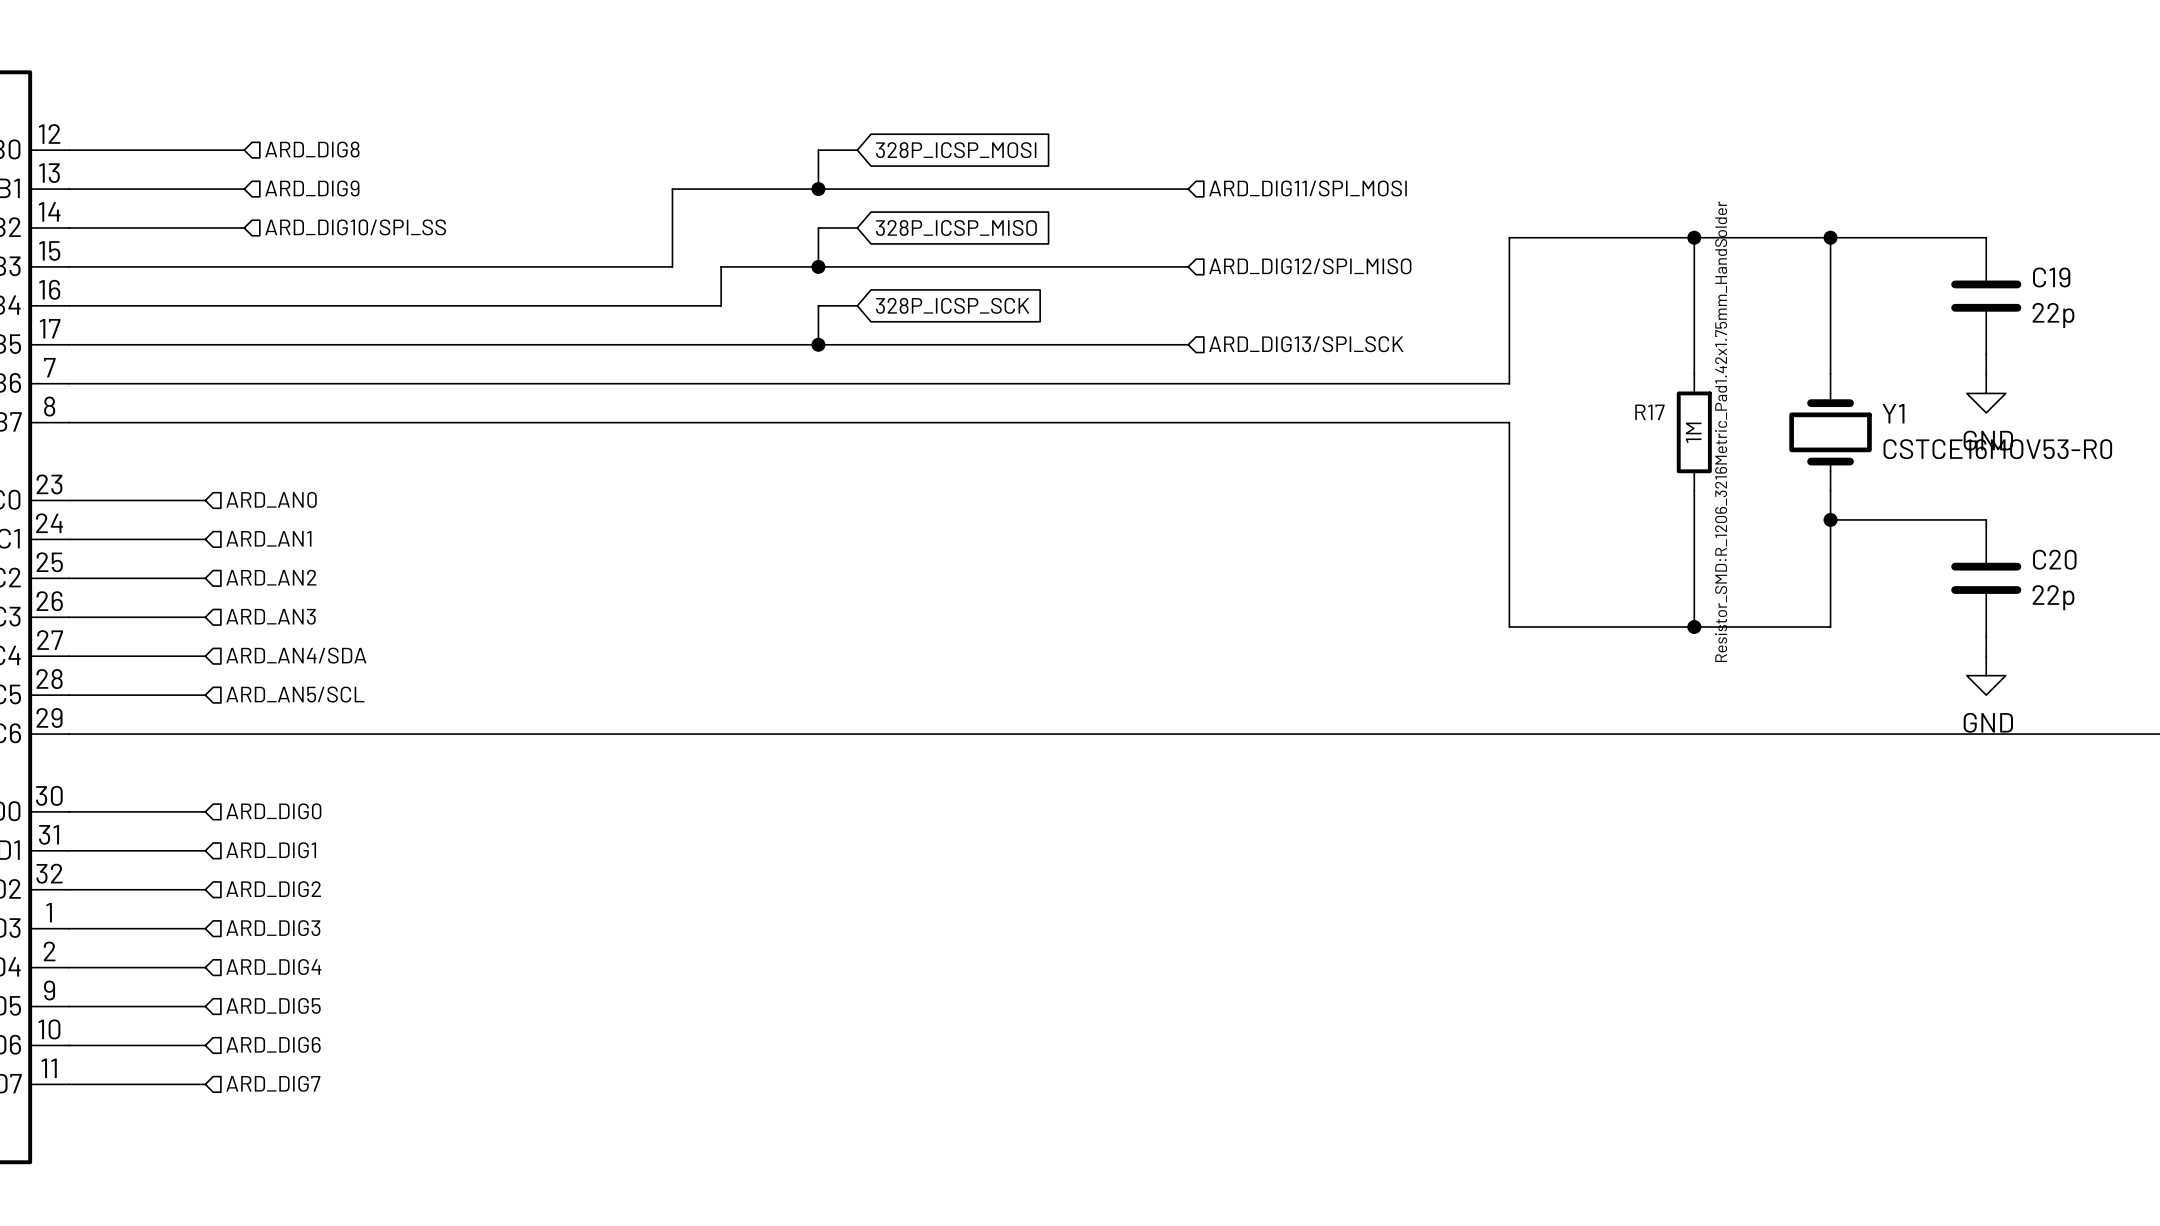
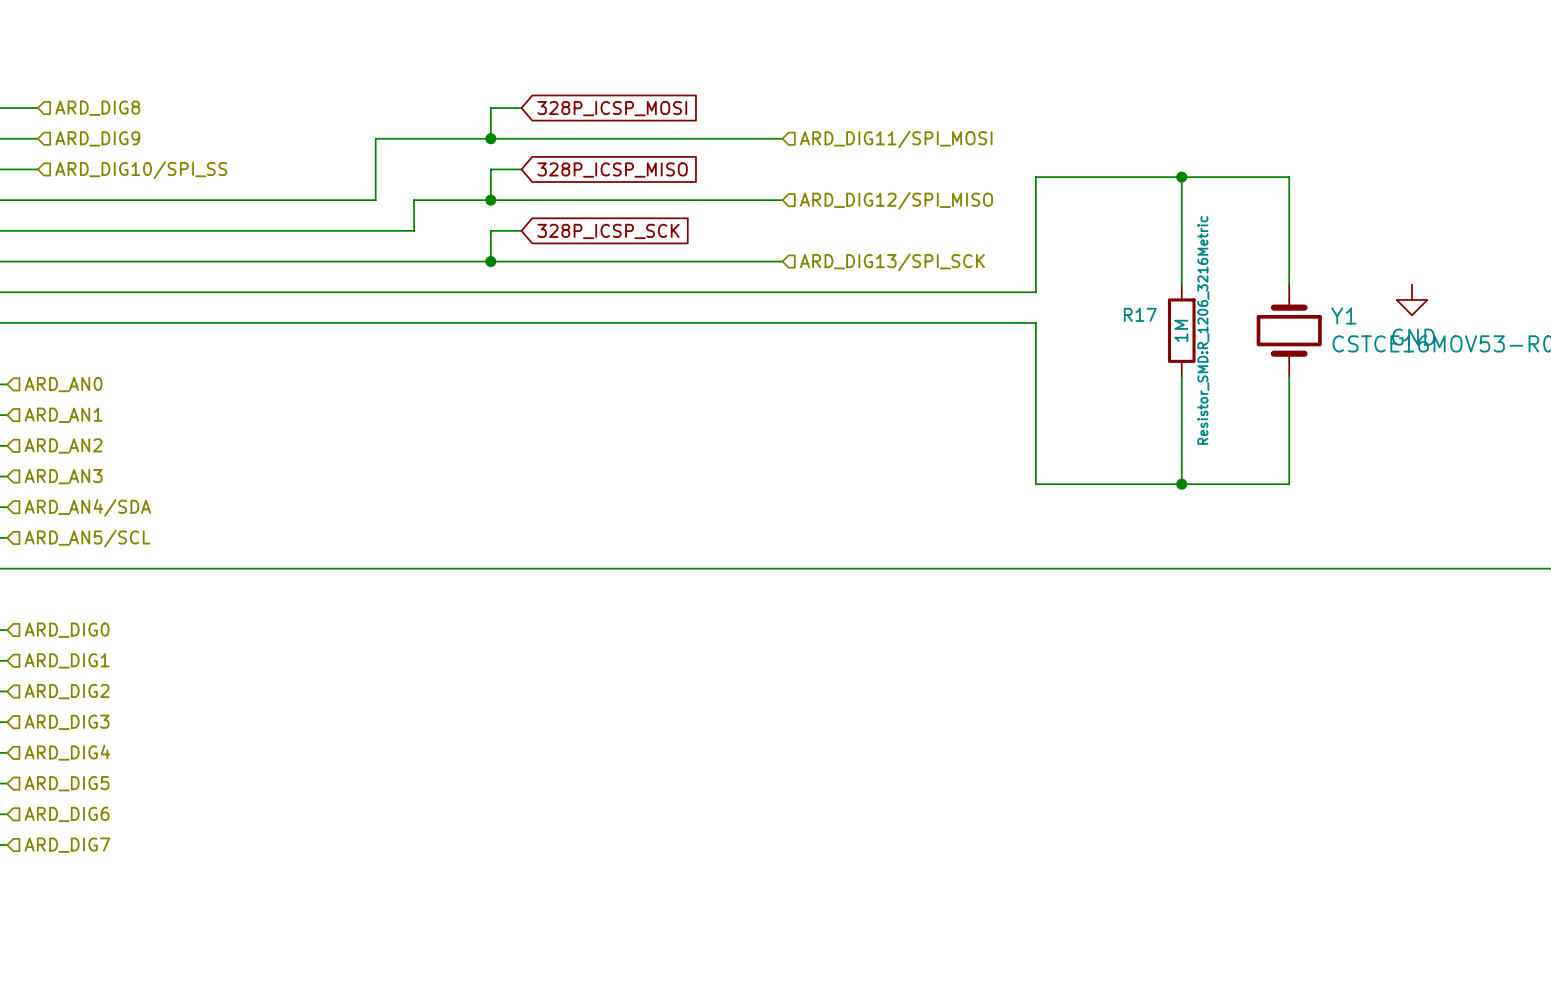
wire: (1830, 237) (1986, 237) -> none
junction: (1830, 237) -> none
C19: 22p (1986, 296) -> none
wire: (1986, 354) (1986, 373) -> none
R17 text: Resistor_SMD:R_1206_3216Metric_Pad1.42x1.75mm_HandSolder (1721, 431) -> Resistor_SMD:R_1206_3216Metric (1203, 330)
wire: (1830, 519) (1986, 519) -> none
junction: (1830, 519) -> none
C20: 22p (1986, 578) -> none
wire: (1986, 636) (1986, 656) -> none
power symbol: GND (1986, 675) -> none

